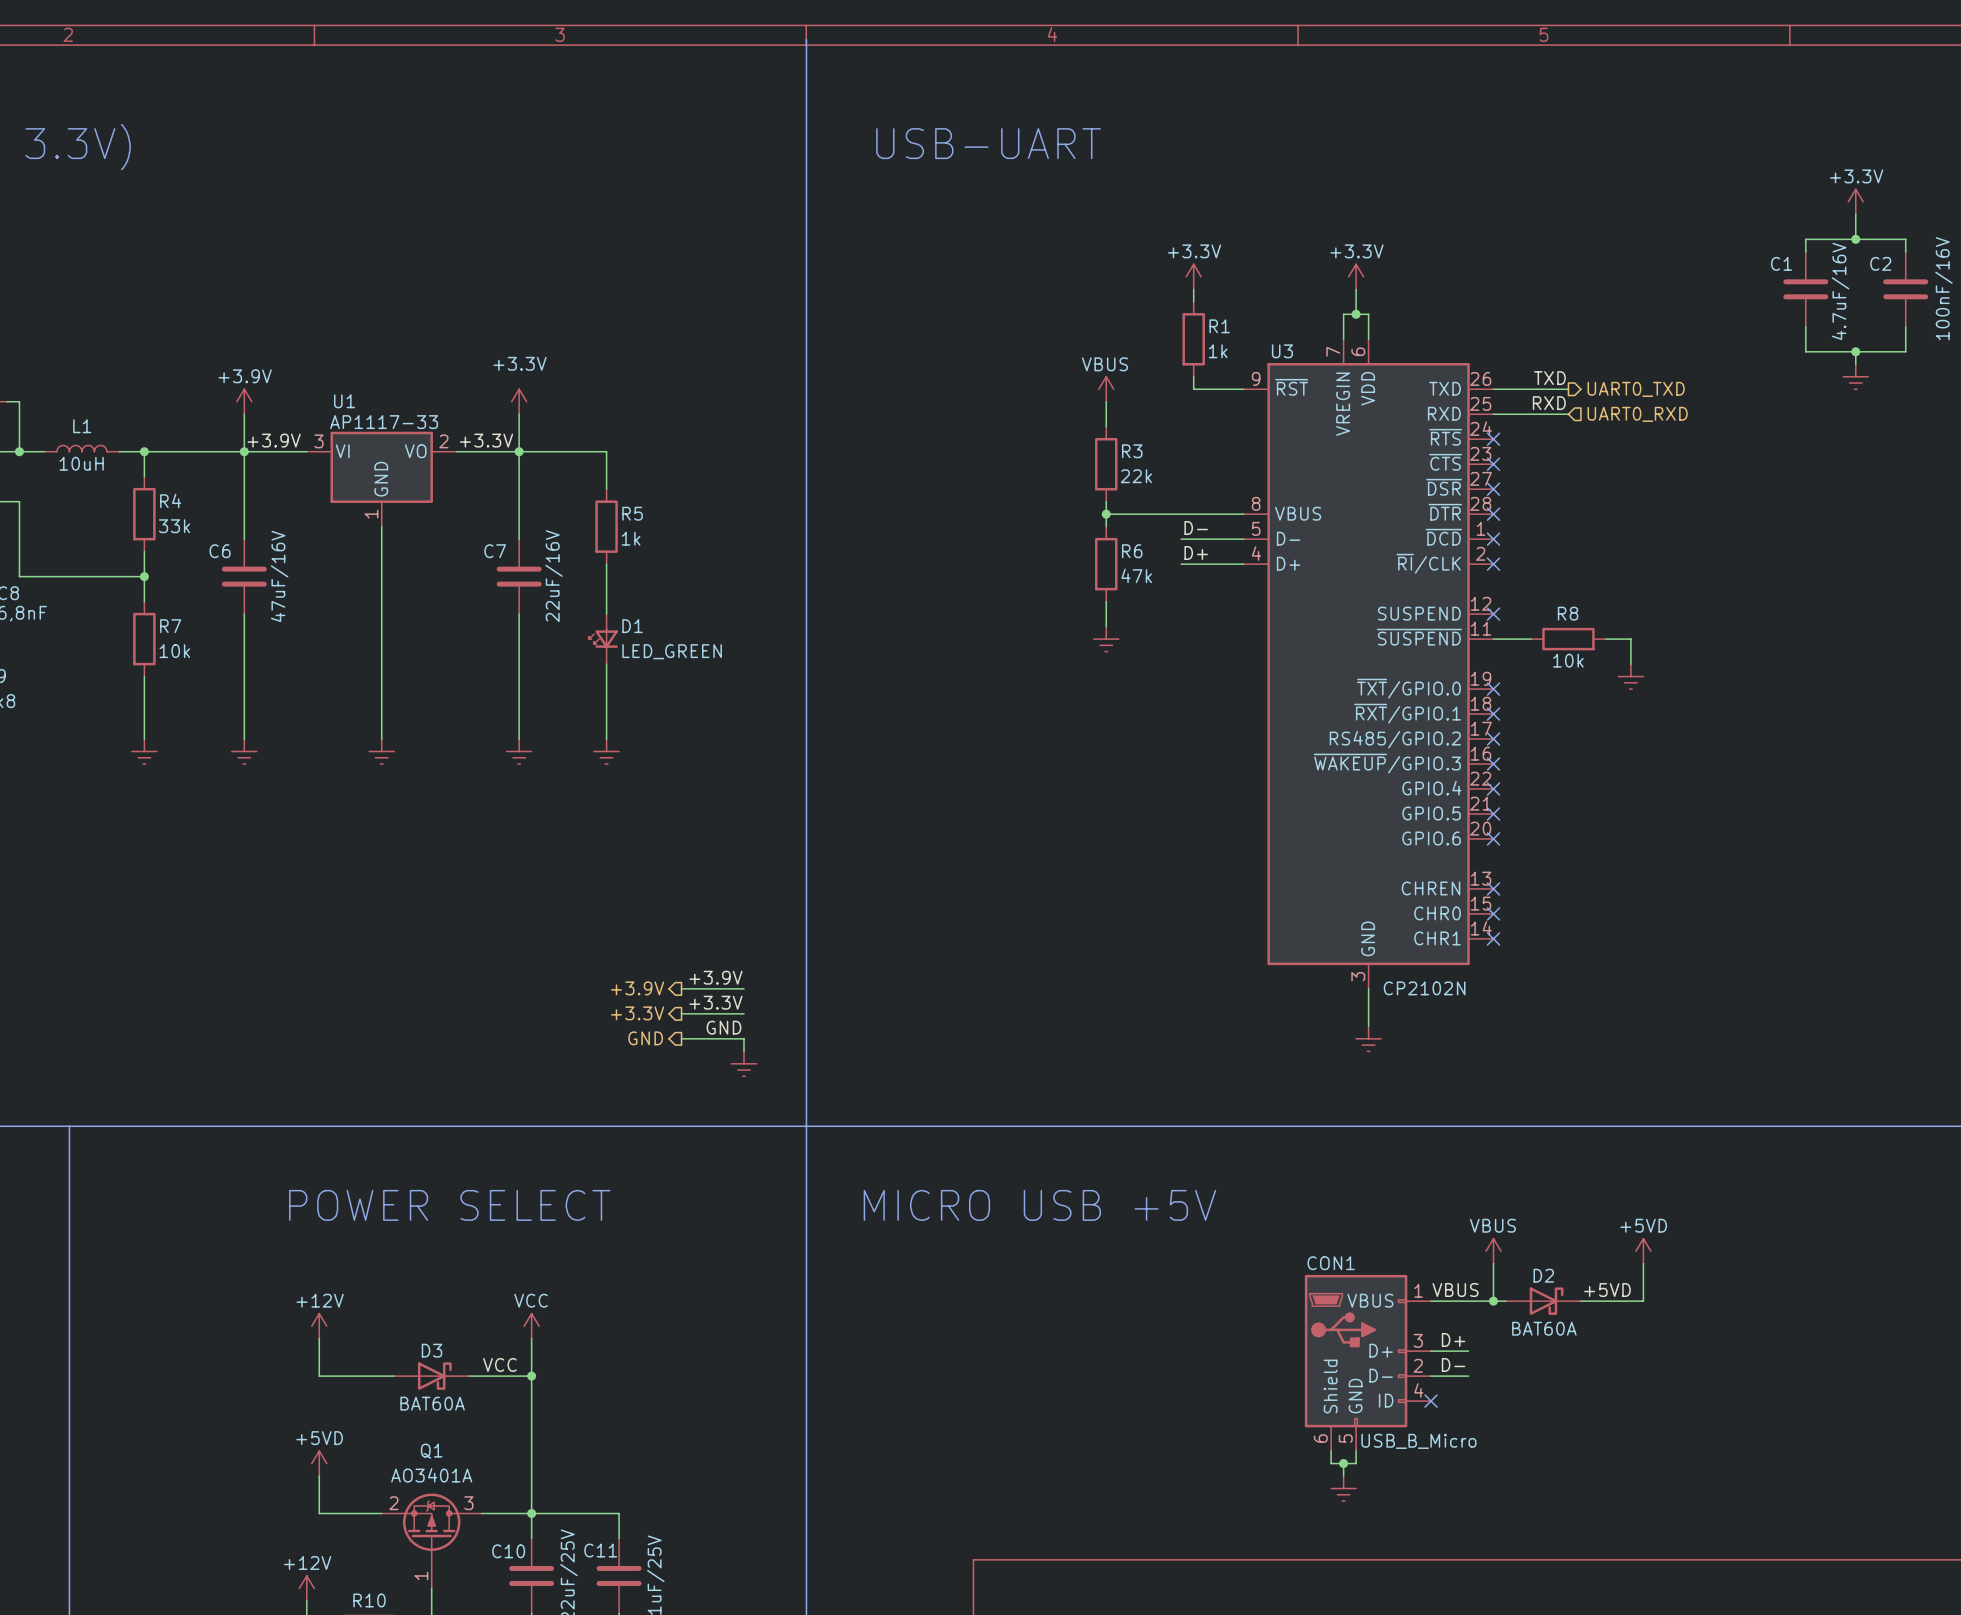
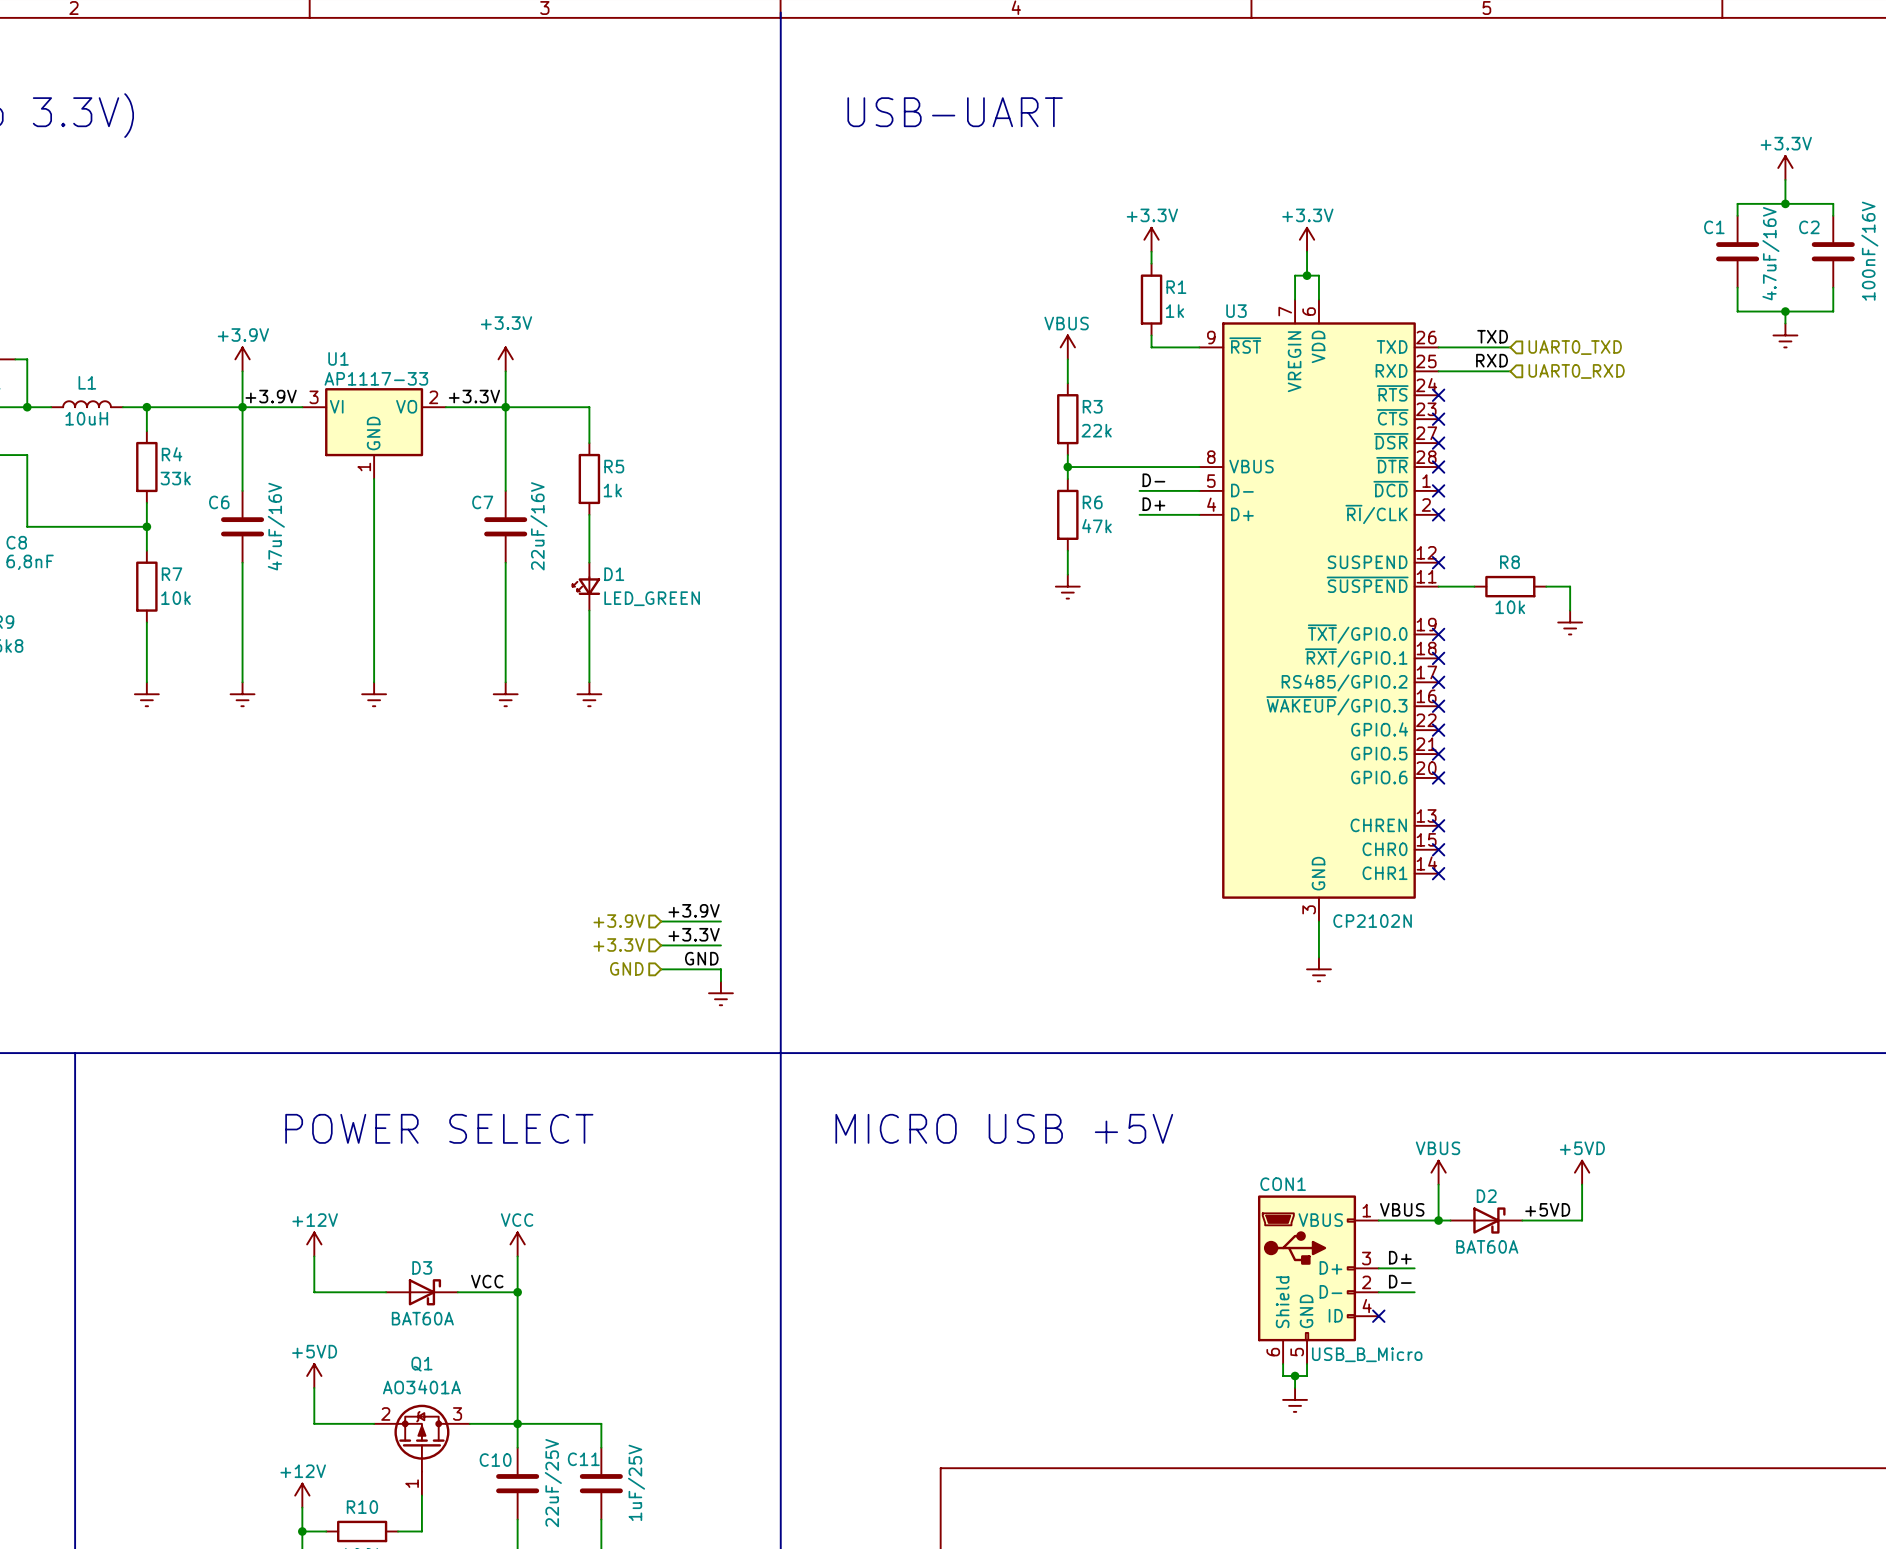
hierarchical label shape: output (1636, 389) -> input (1575, 347)
hierarchical label shape: output (637, 988) -> input (619, 921)
hierarchical label shape: output (637, 1013) -> input (619, 944)
hierarchical label shape: output (645, 1038) -> input (626, 968)

